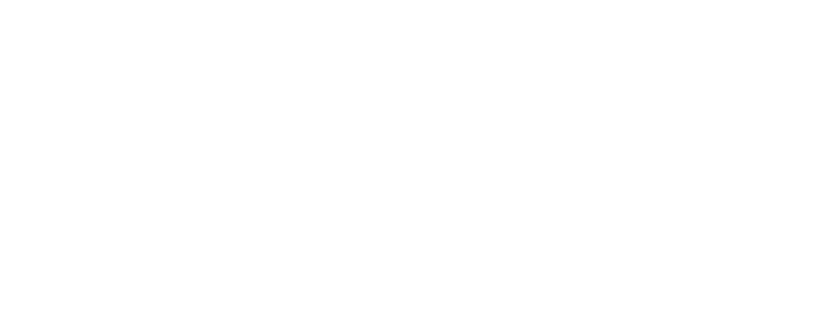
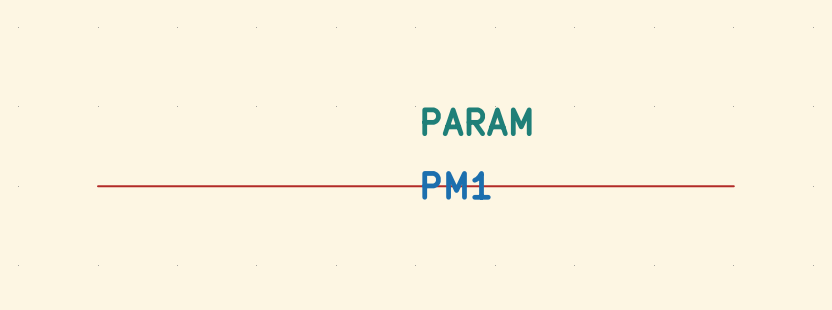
PM1: none -> PARAM (415, 186)

